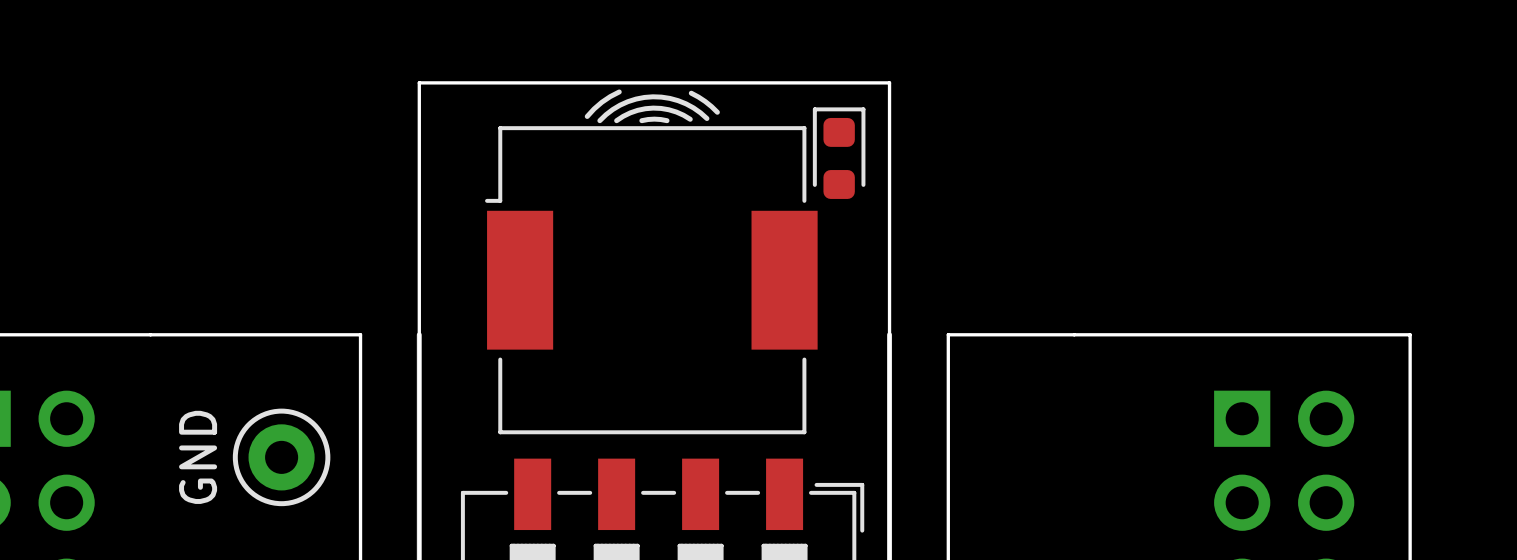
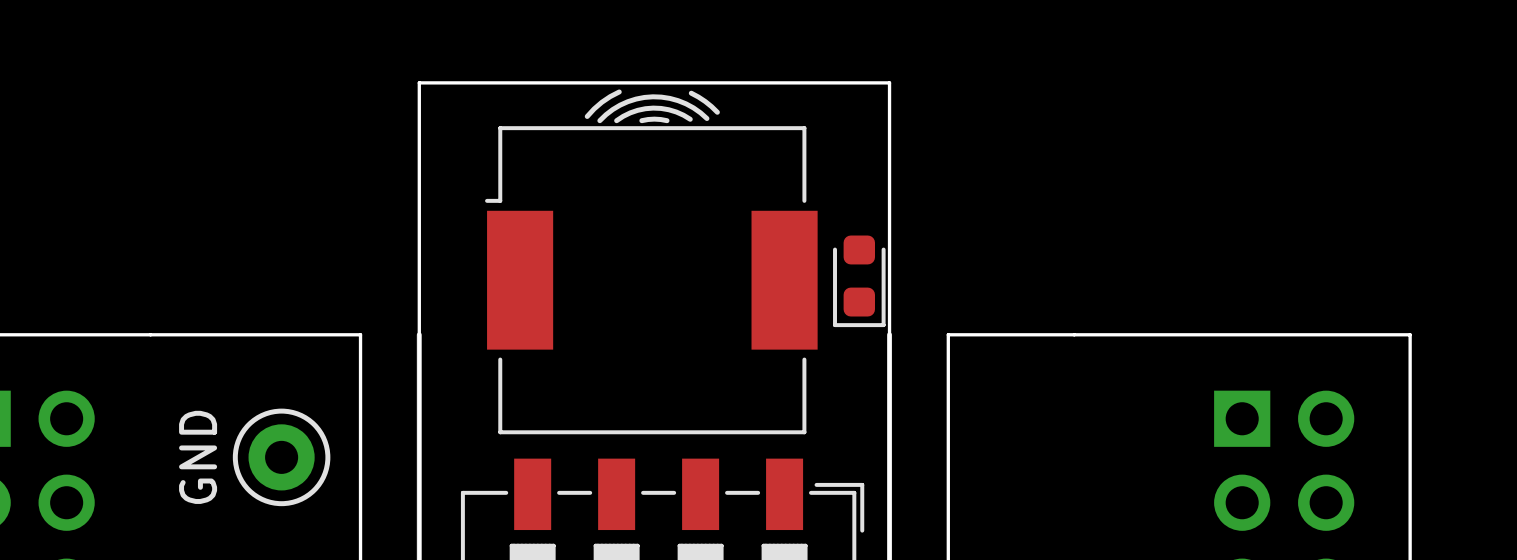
part rotation: 0° (839, 153) -> 180° (859, 281)
part position: (839, 153) -> (859, 281)

